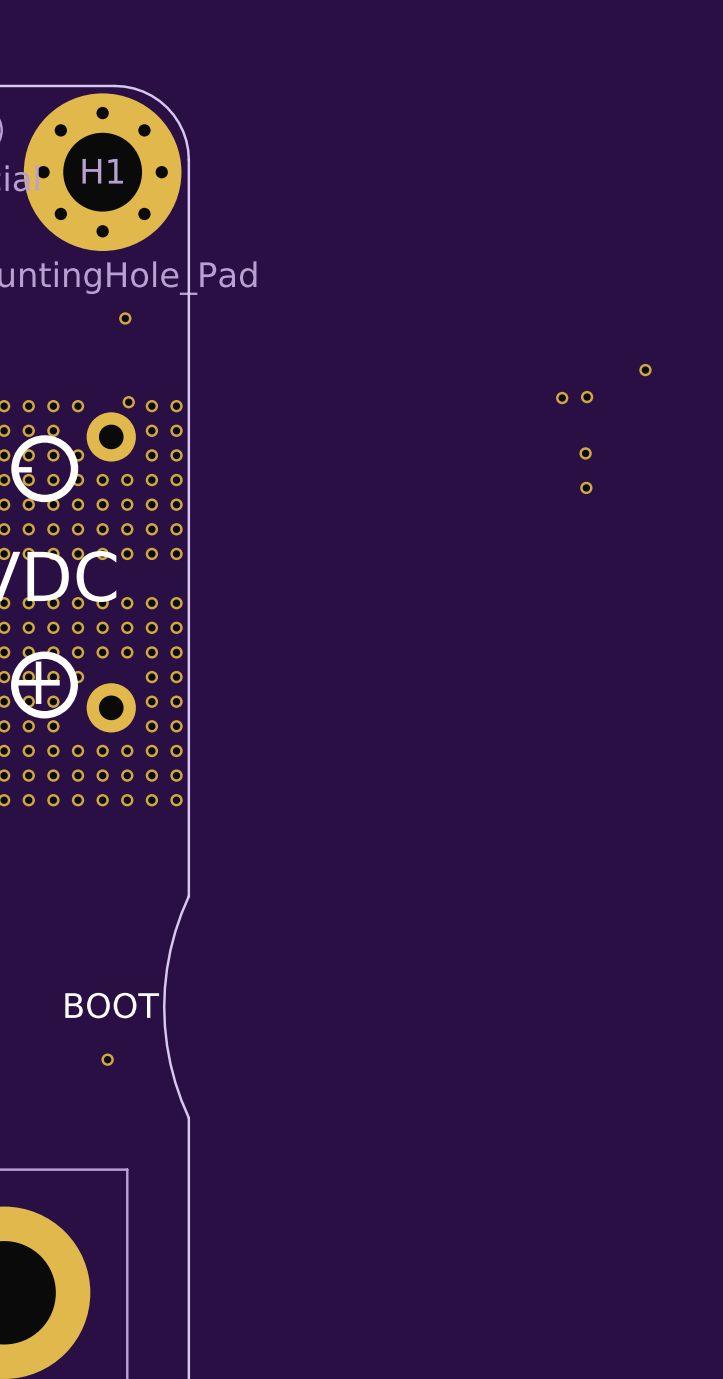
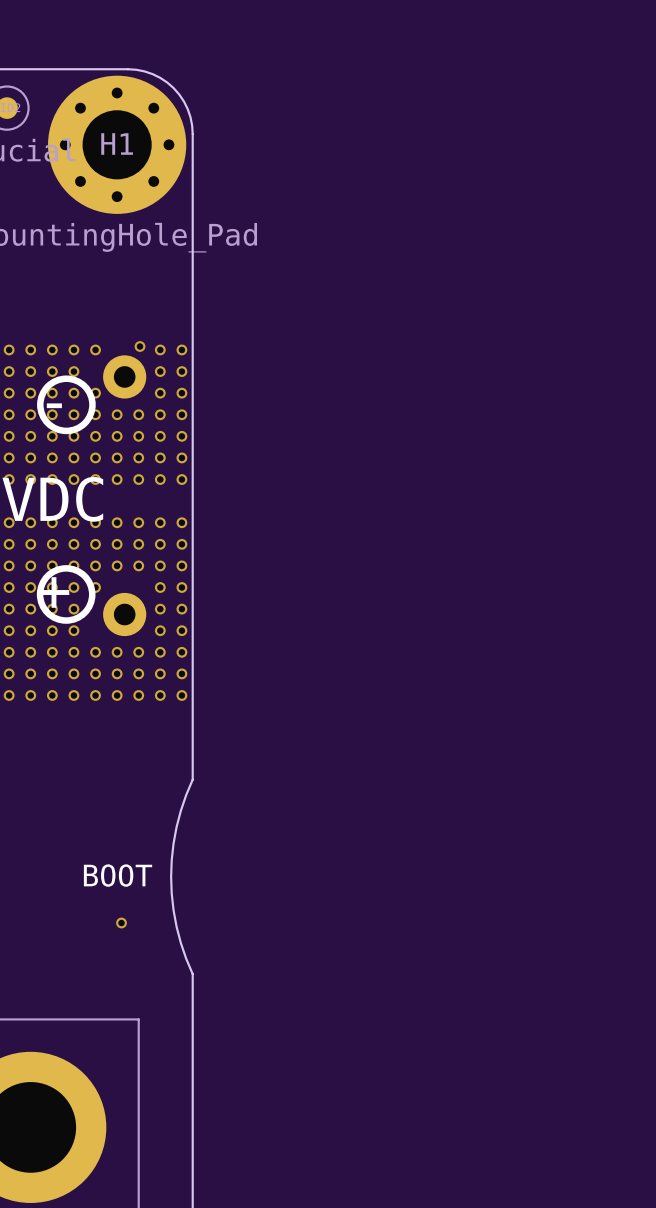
via: (125, 318) -> none
via: (645, 370) -> none
via: (587, 397) -> none
via: (562, 398) -> none
via: (585, 453) -> none
via: (586, 487) -> none

